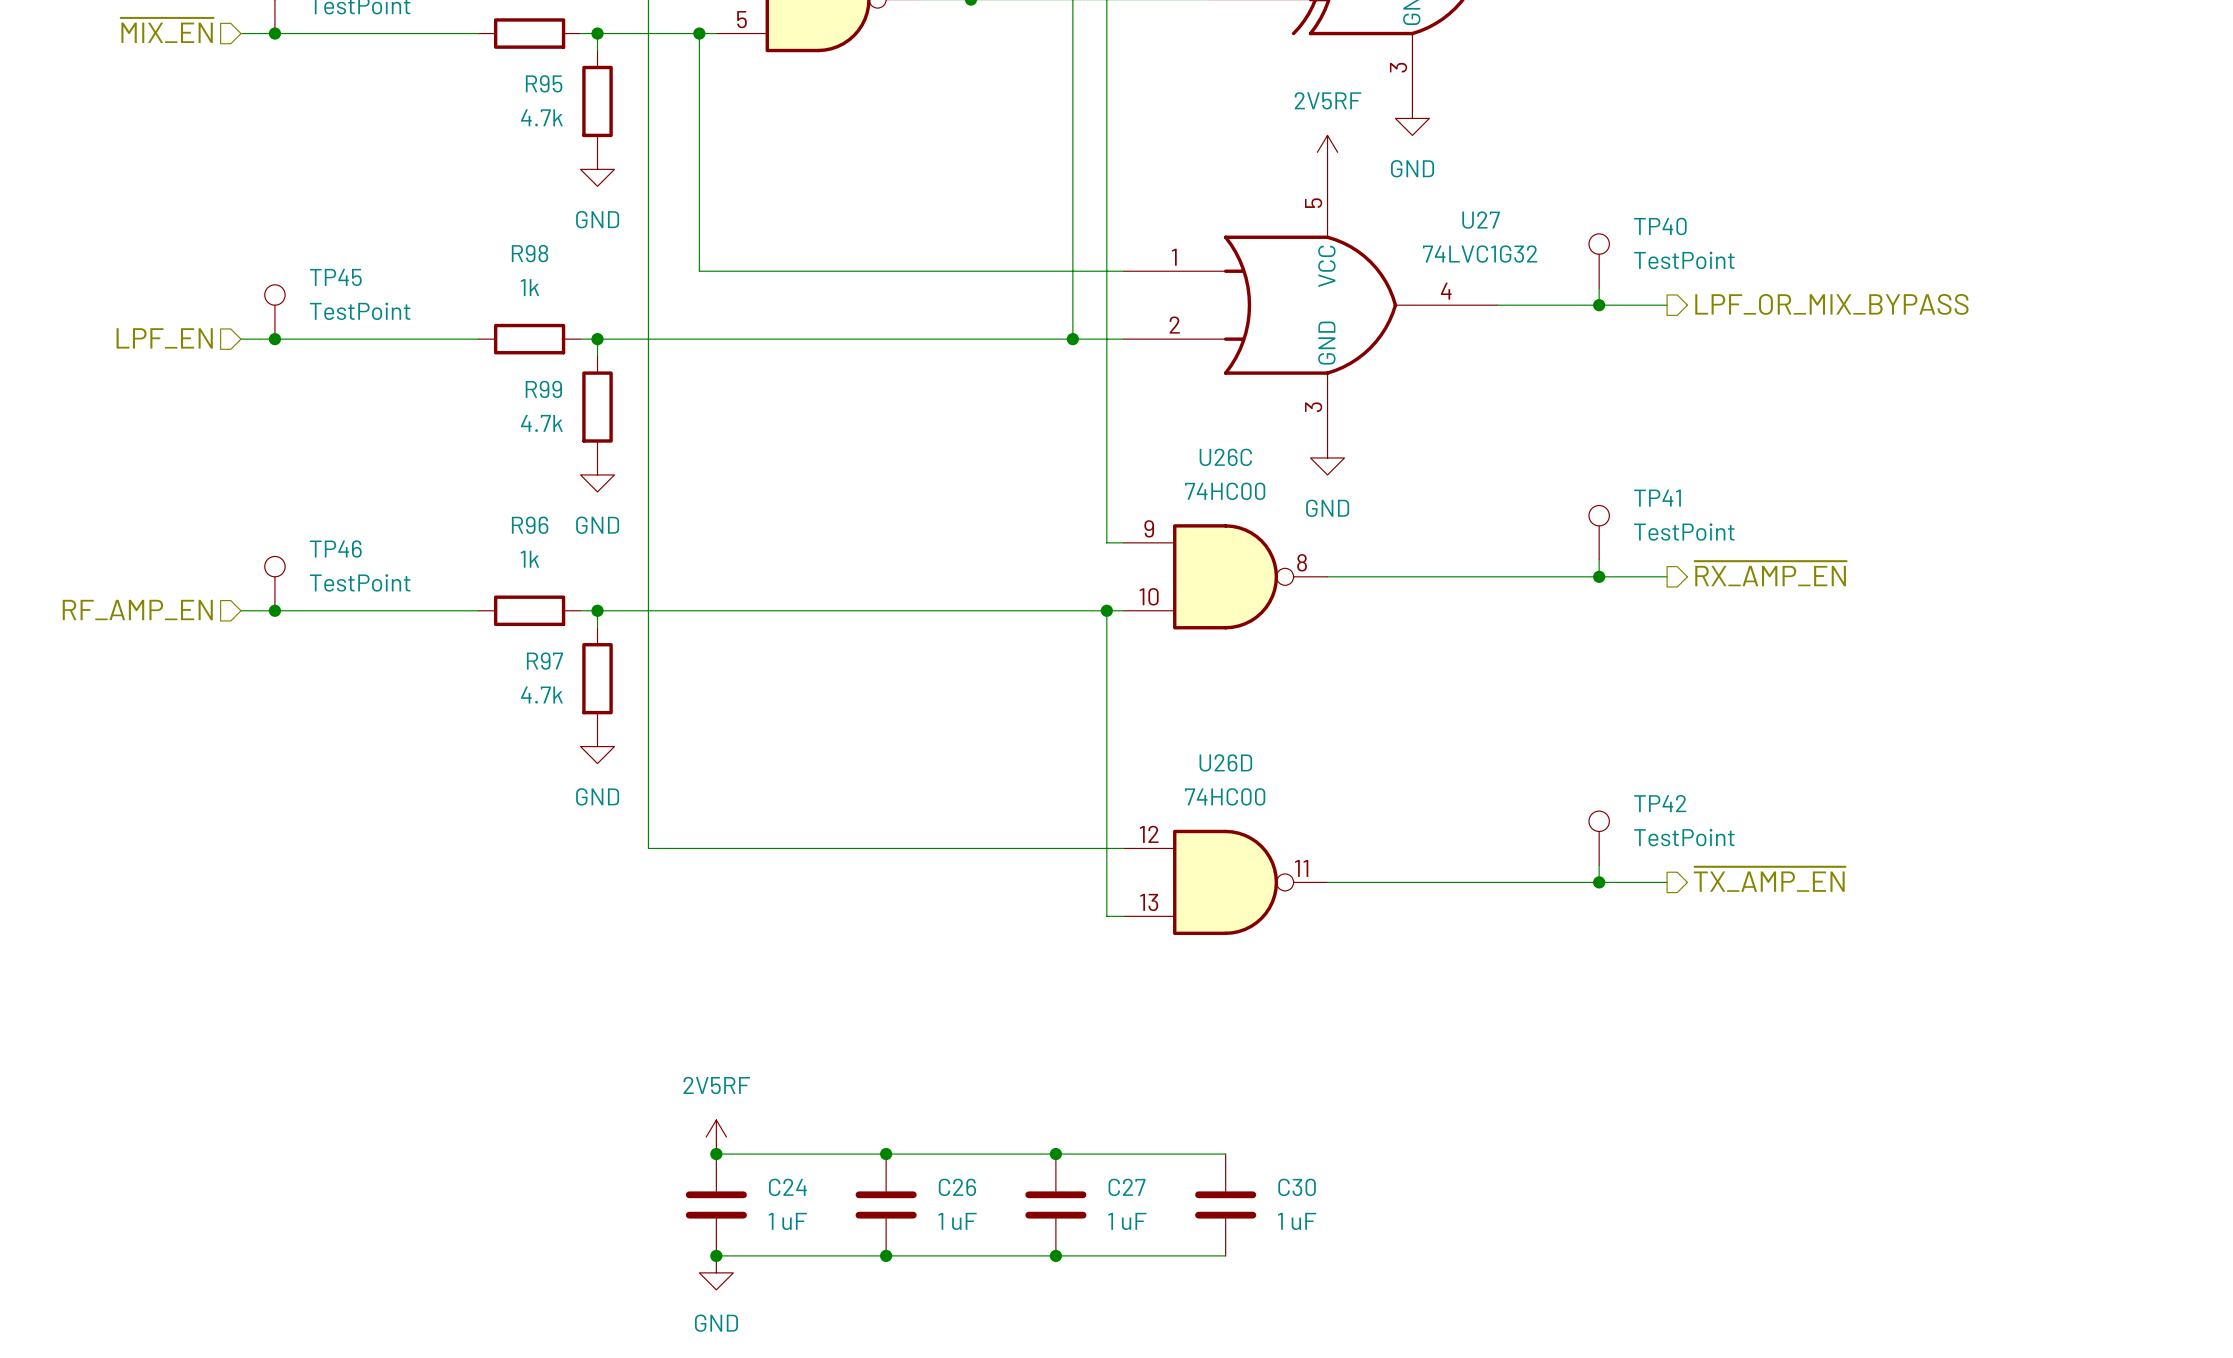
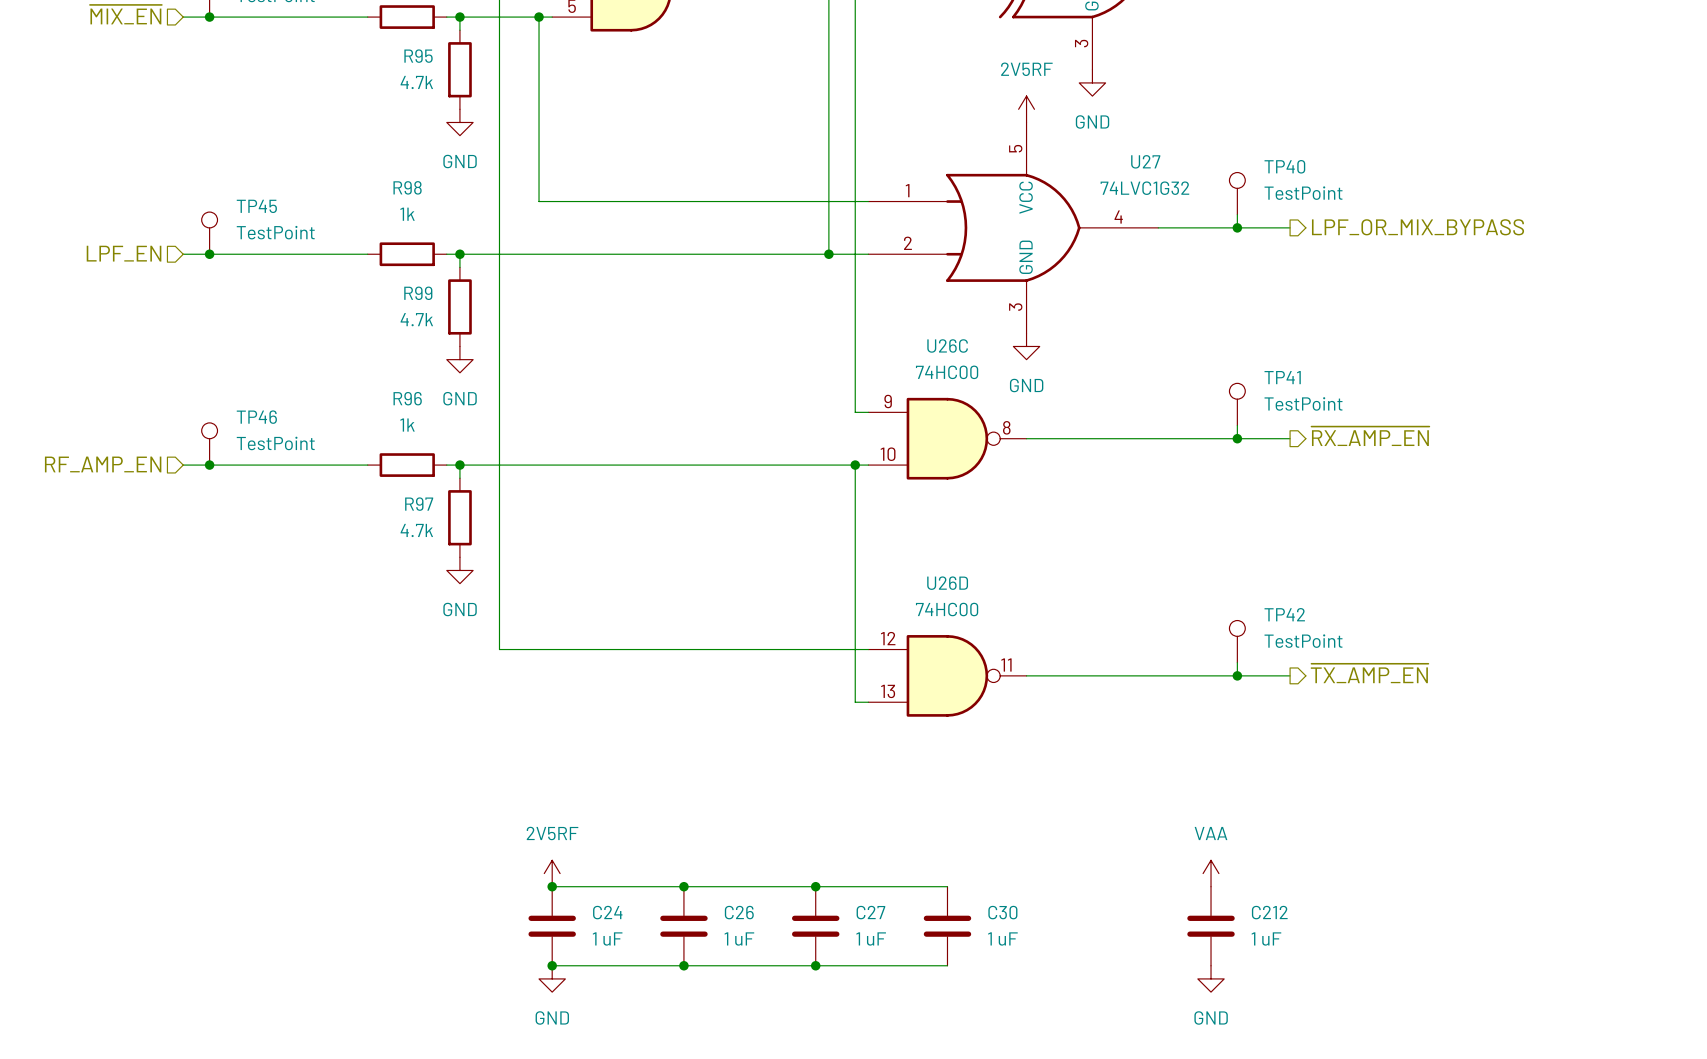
power symbol: none -> VAA (1211, 873)
C212: none -> 1 uF (1211, 926)
power symbol: none -> GND (1211, 978)

